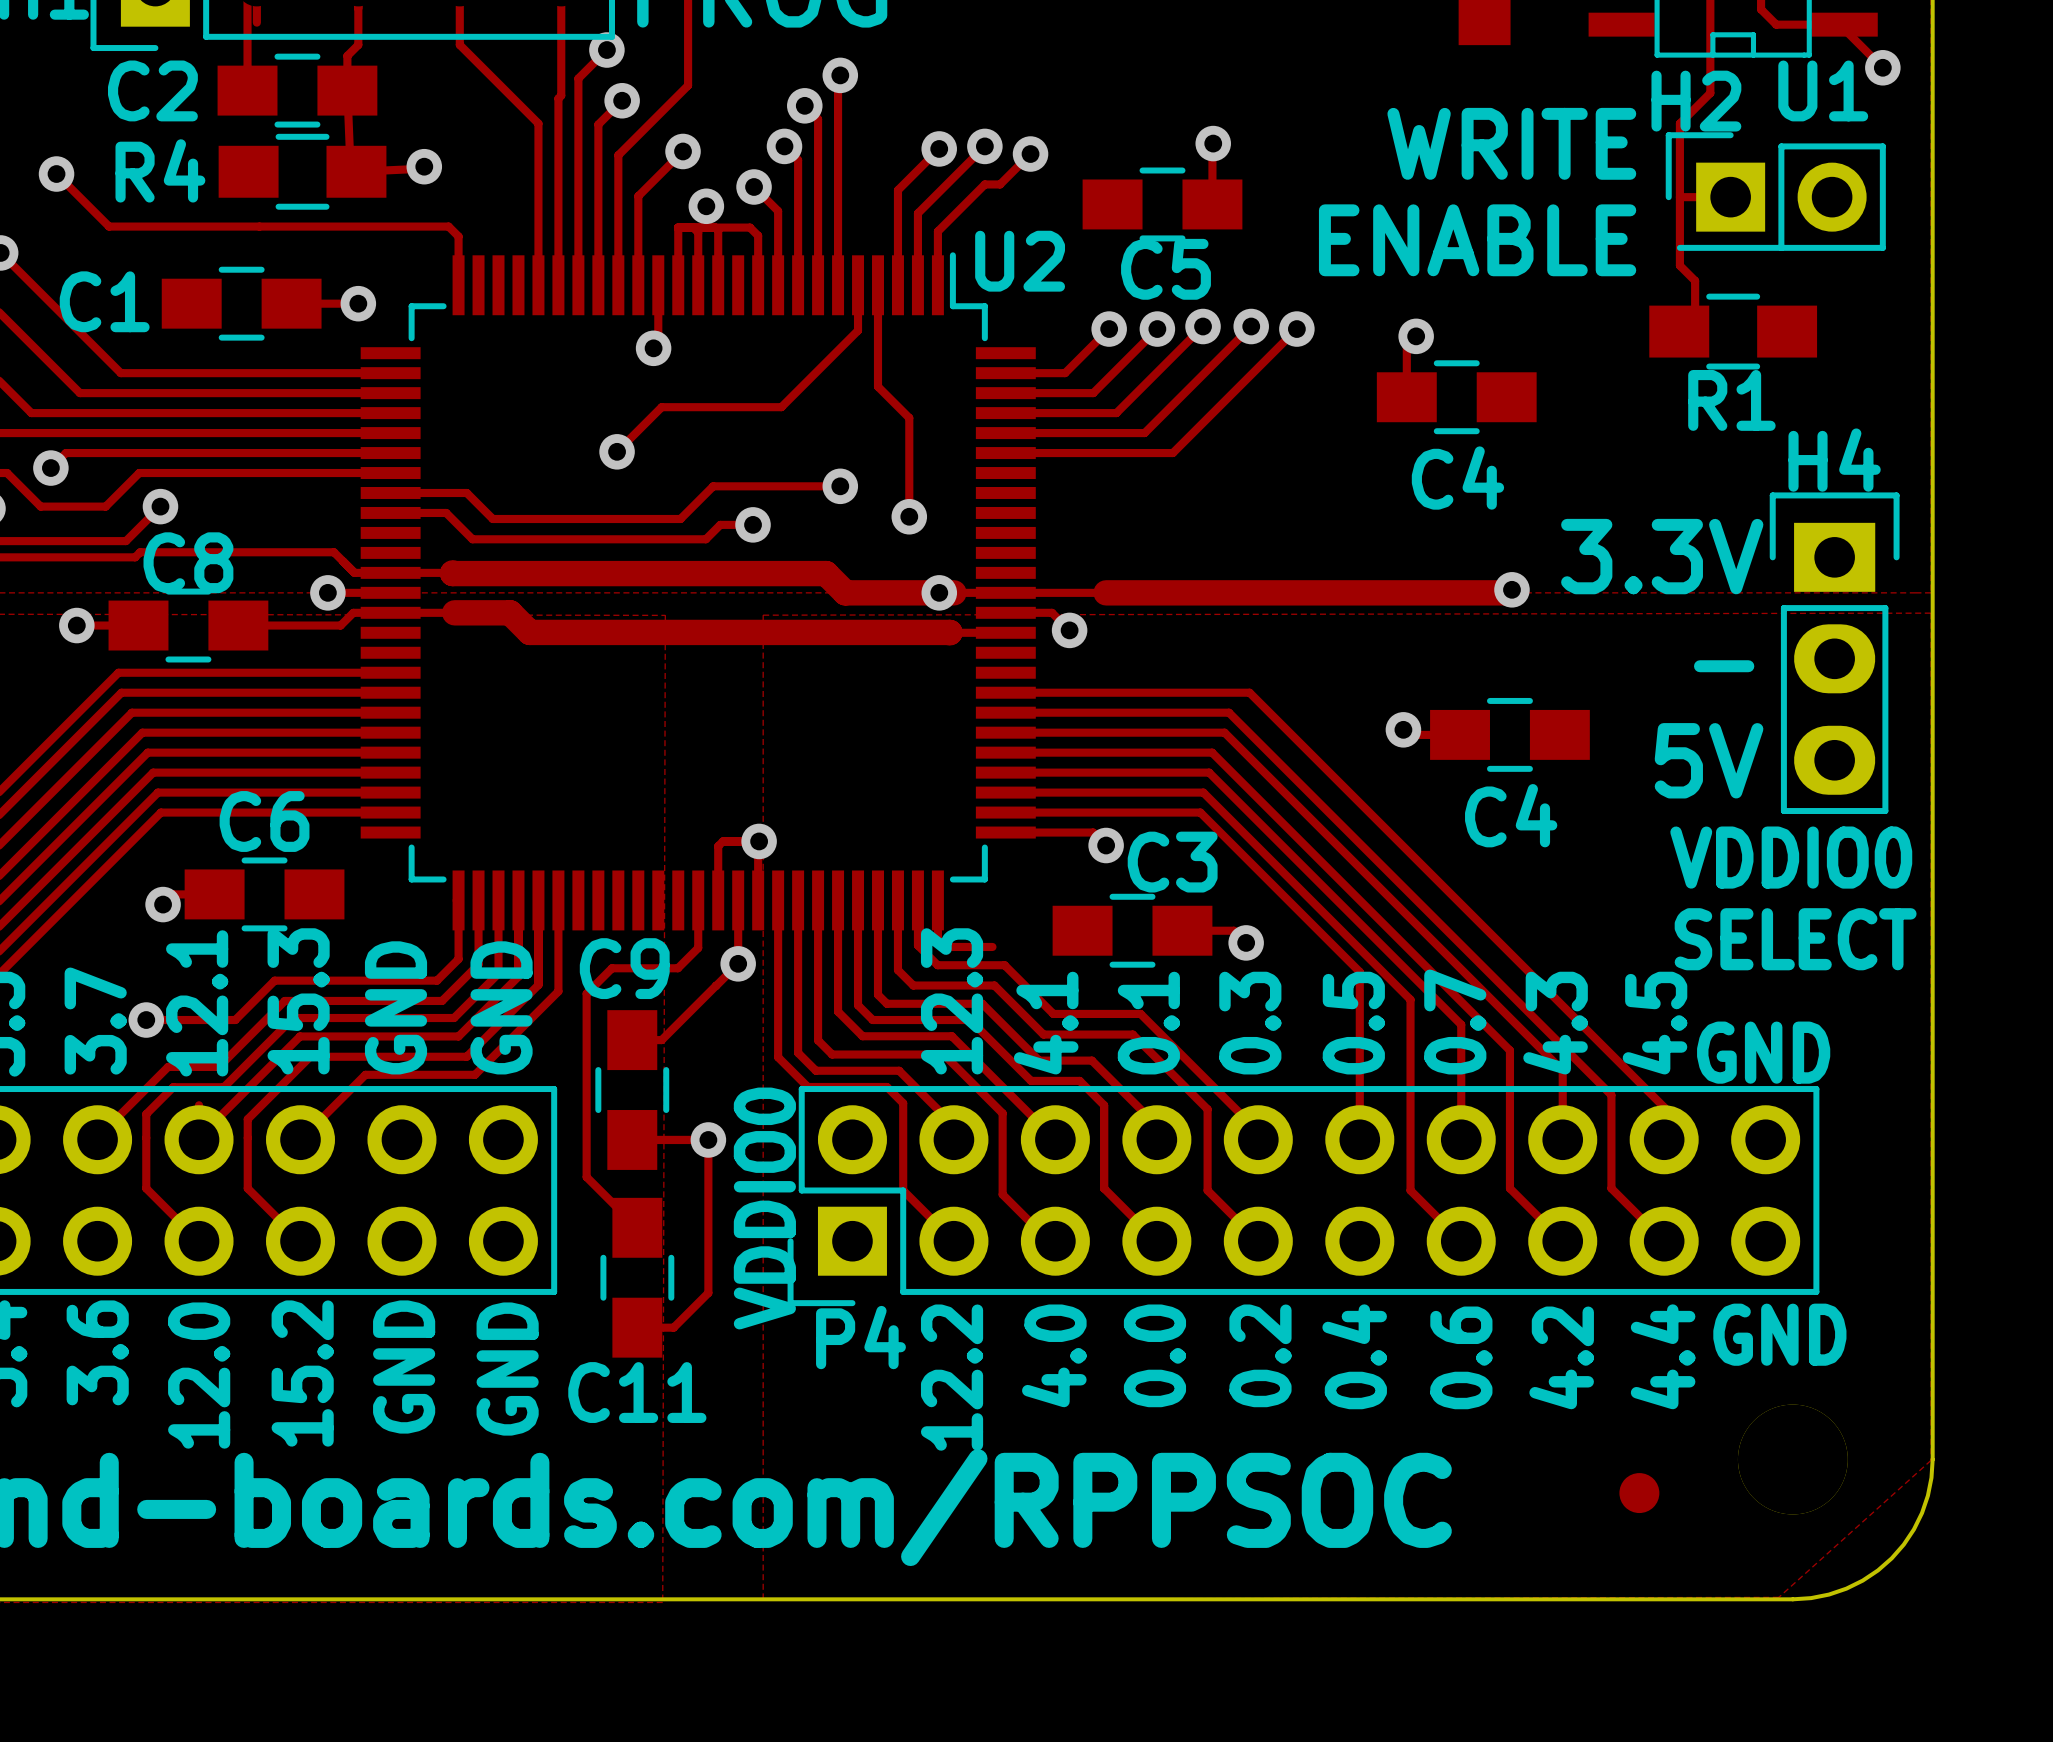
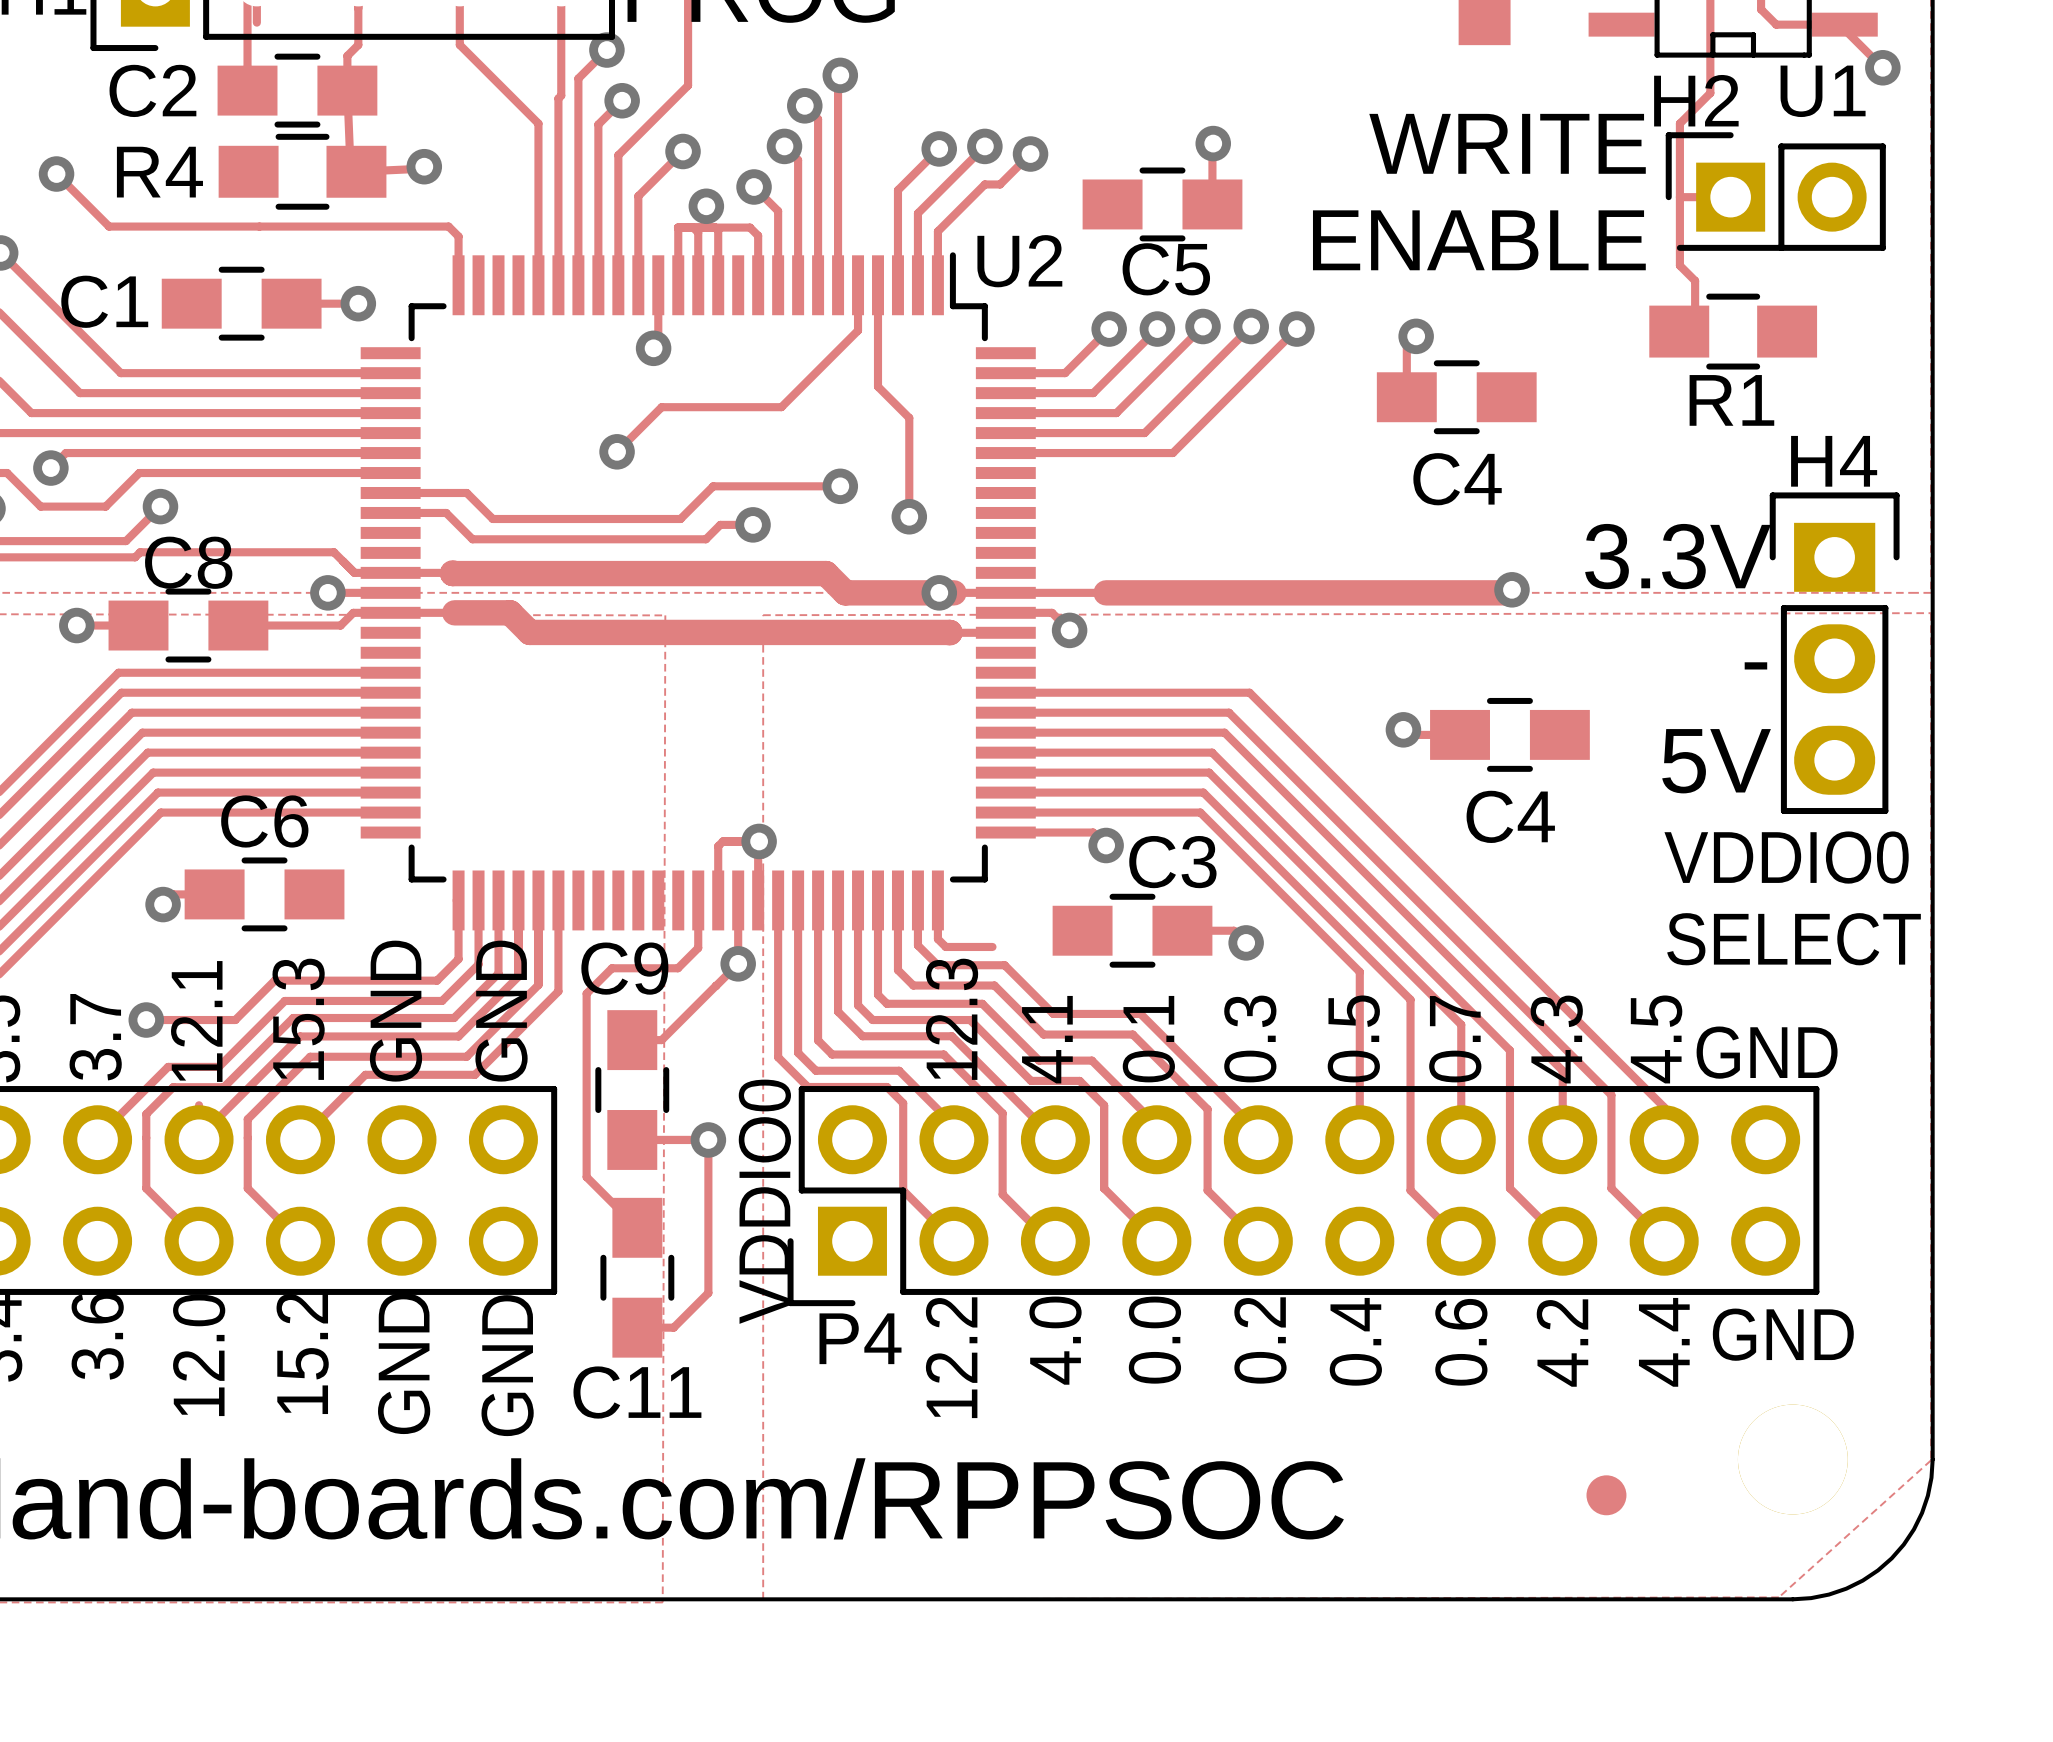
part position: (1639, 1493) -> (1606, 1495)

